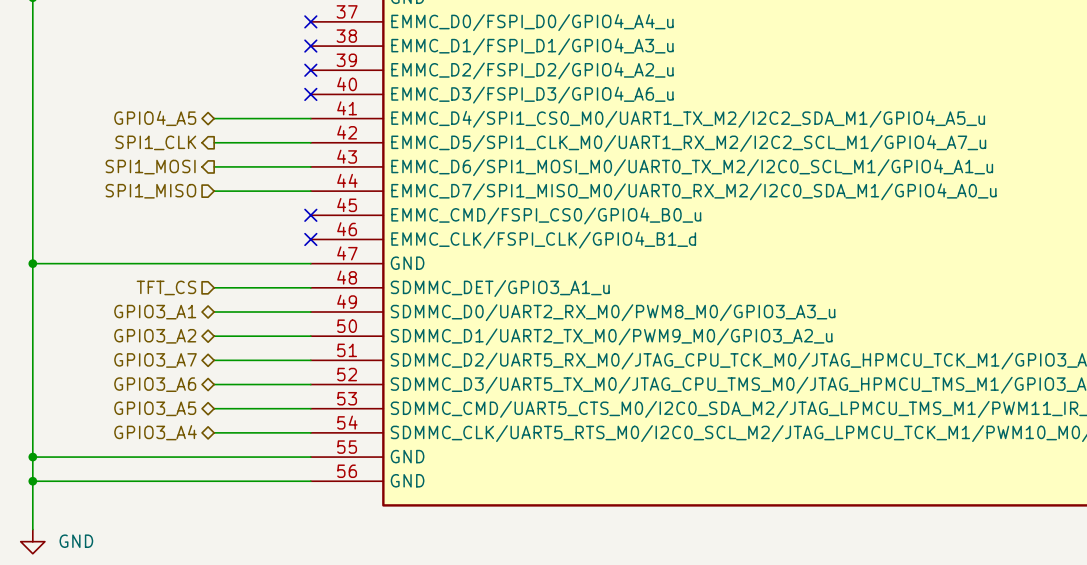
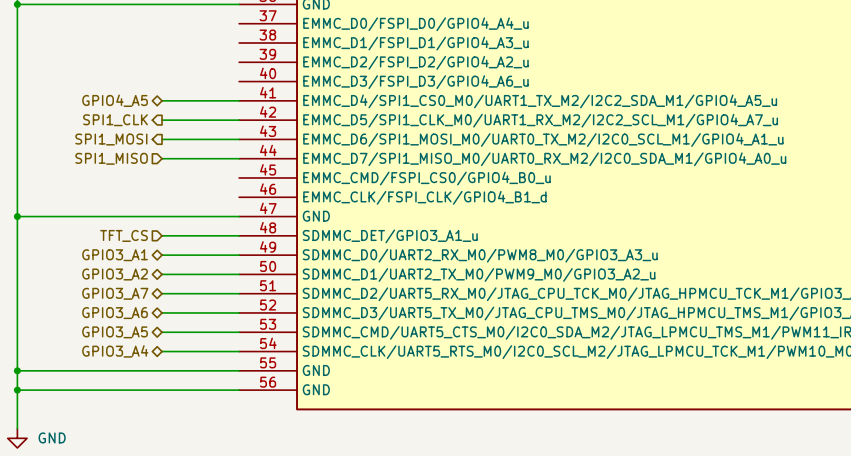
no-connect mark: (310, 21) -> none
no-connect mark: (310, 46) -> none
no-connect mark: (310, 70) -> none
no-connect mark: (310, 94) -> none
no-connect mark: (310, 215) -> none
no-connect mark: (310, 239) -> none

